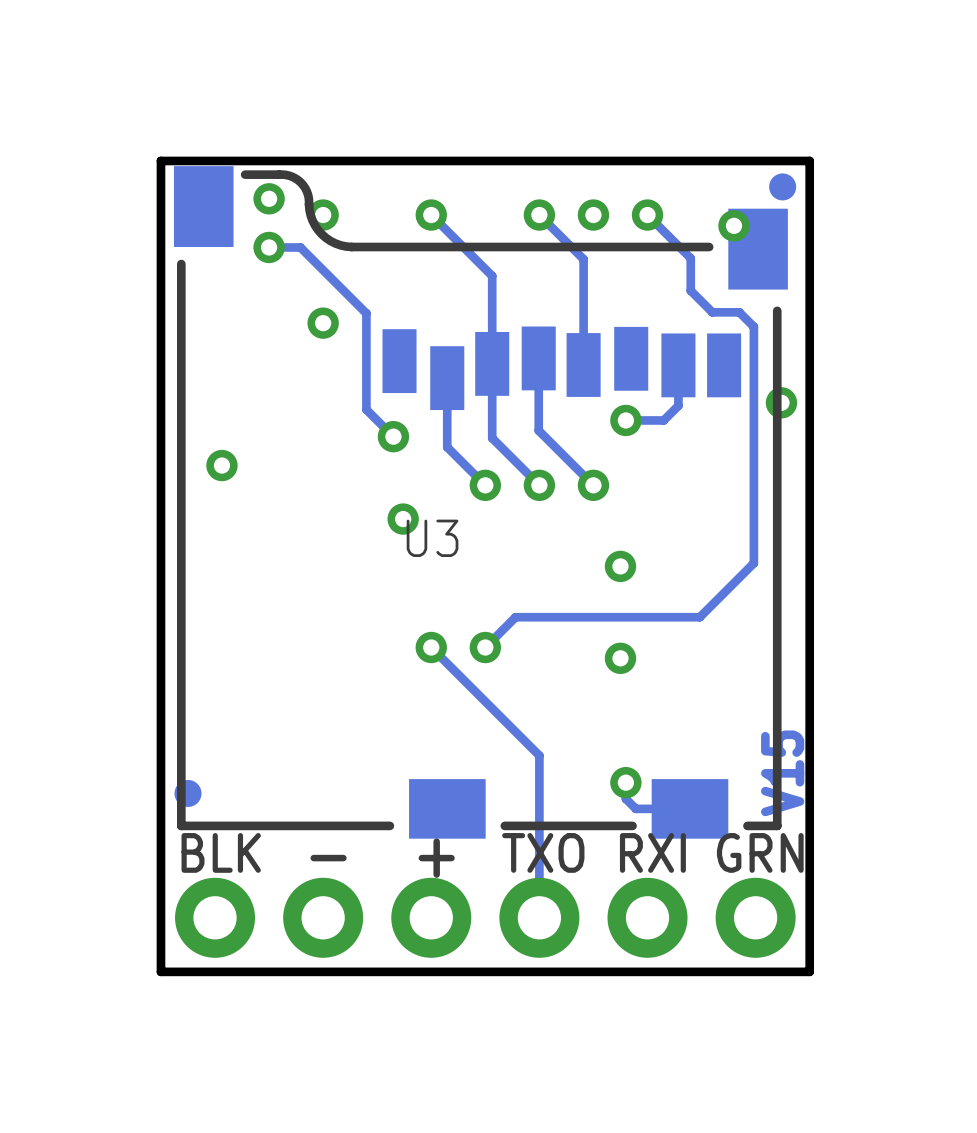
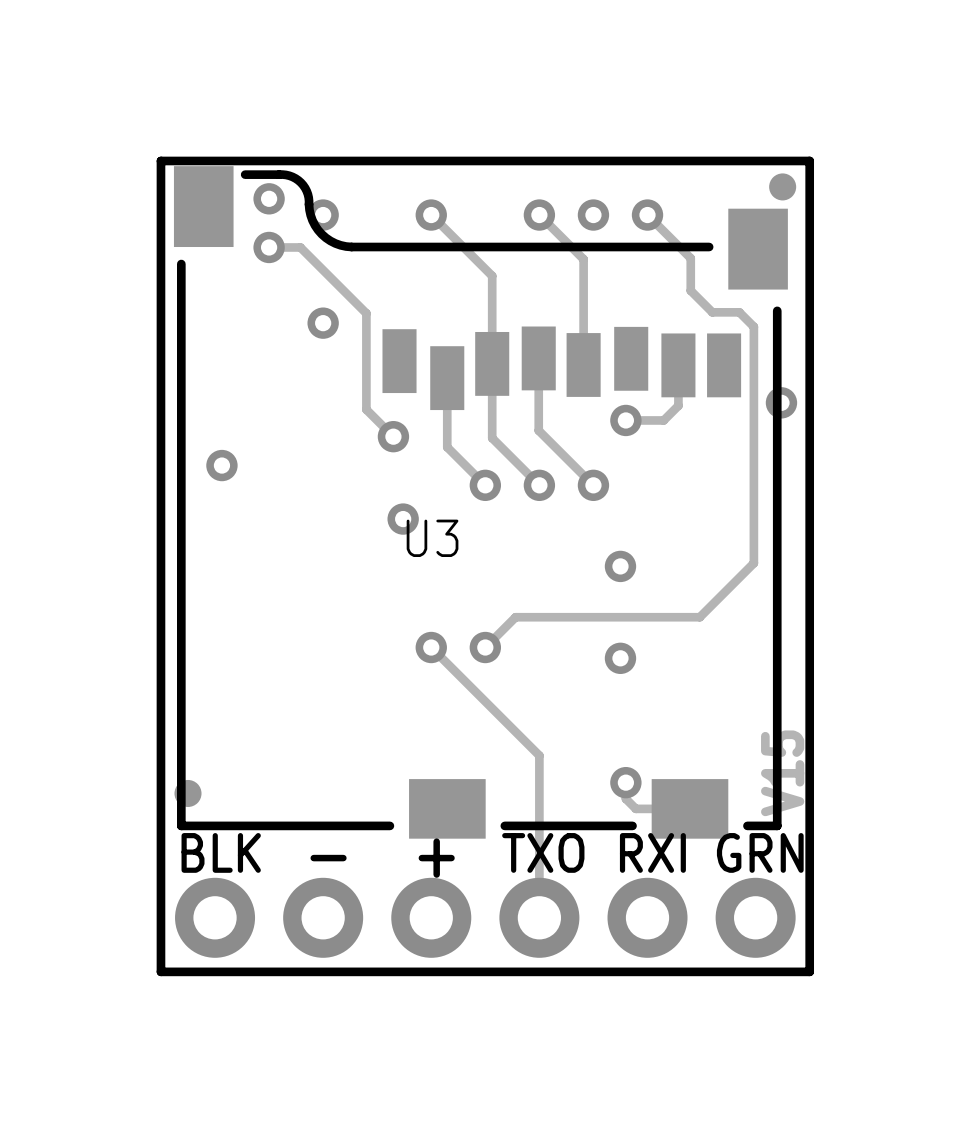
via: (734, 225) -> none

